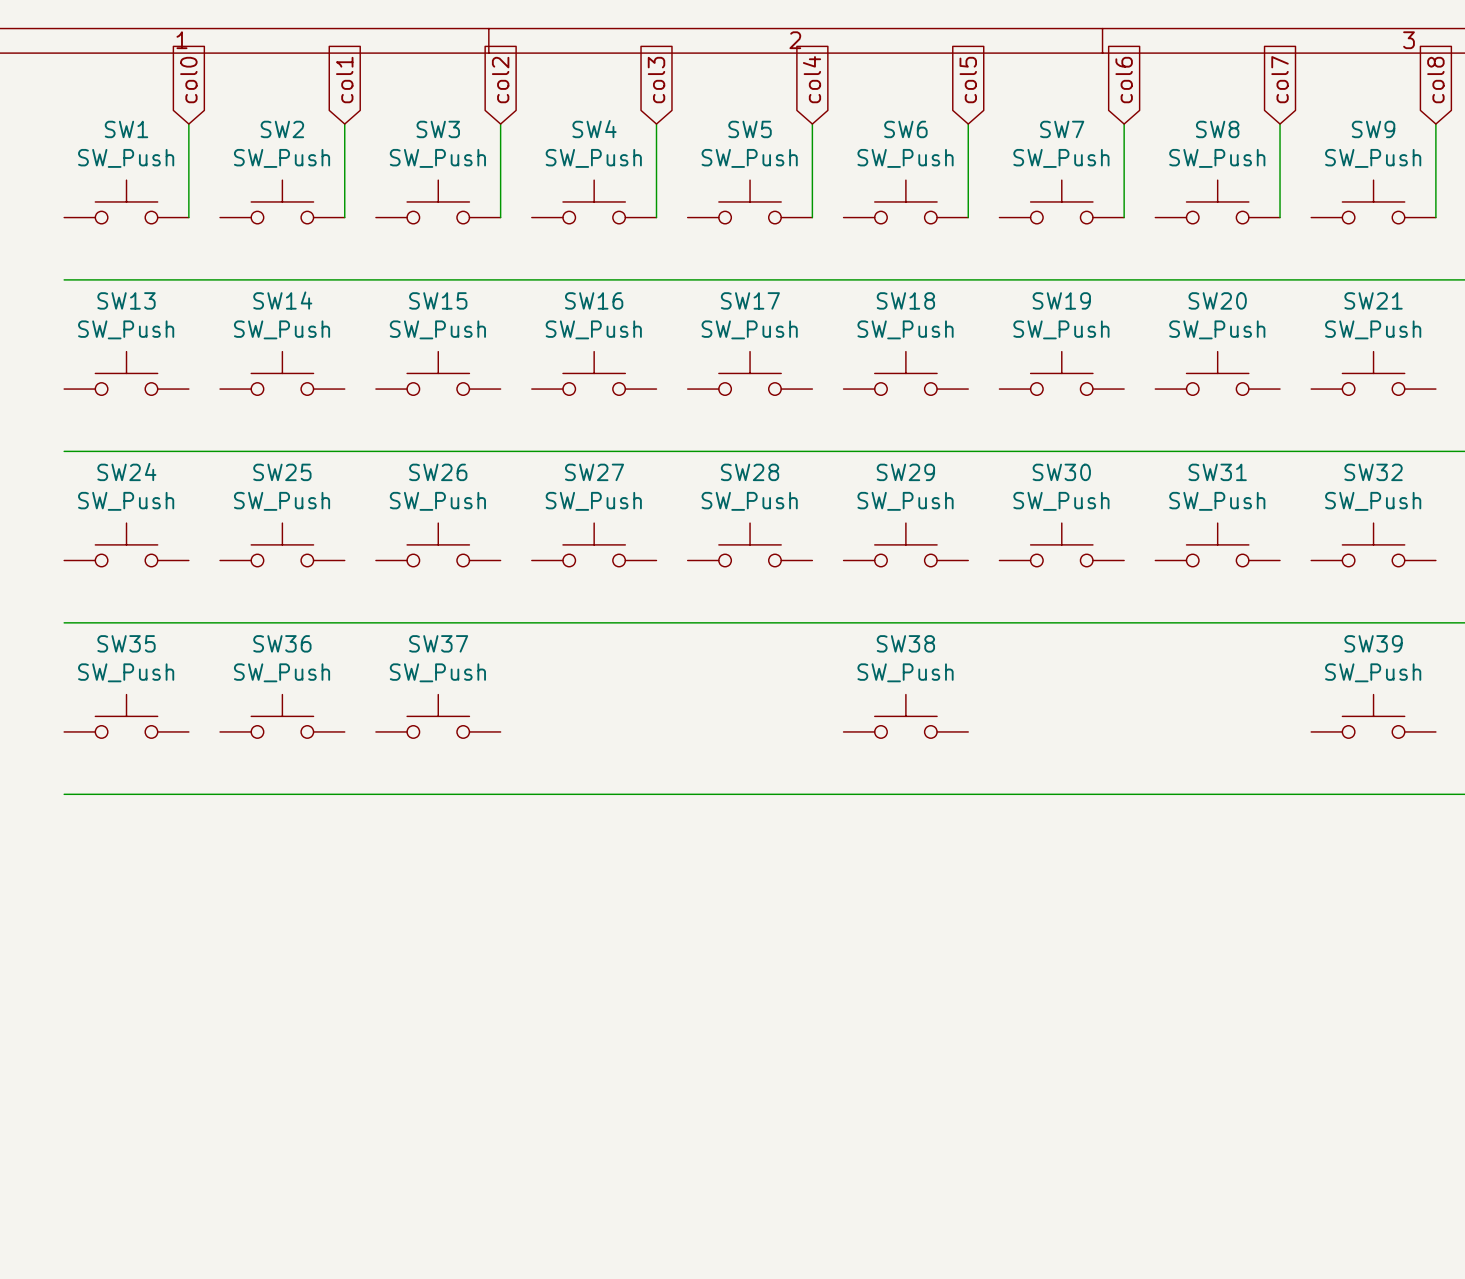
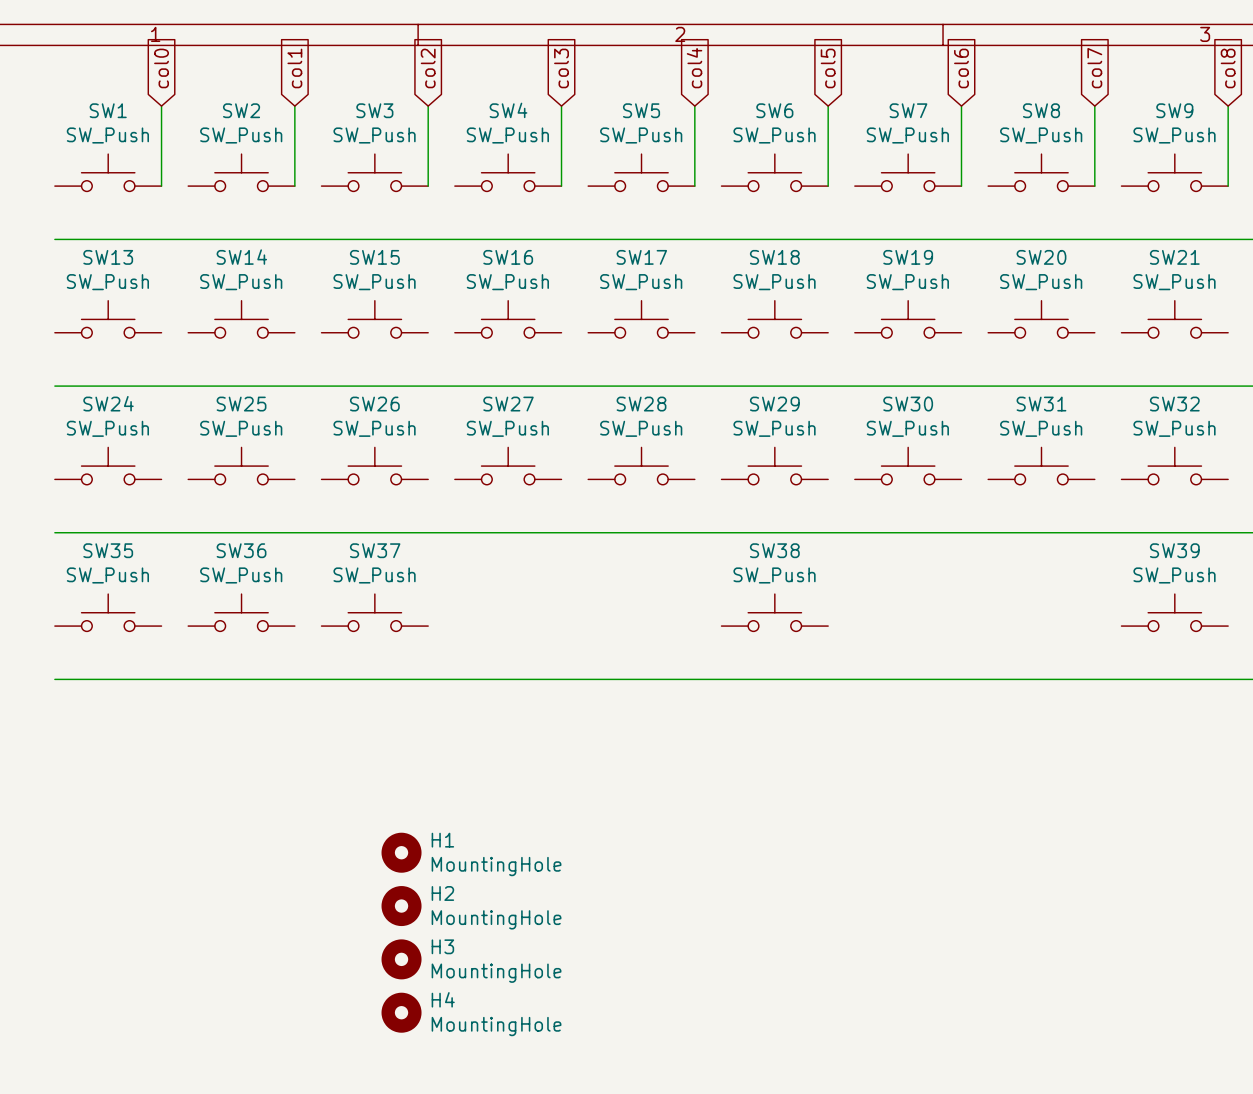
H1: none -> MountingHole (401, 852)
H2: none -> MountingHole (401, 906)
H3: none -> MountingHole (401, 959)
H4: none -> MountingHole (401, 1012)

